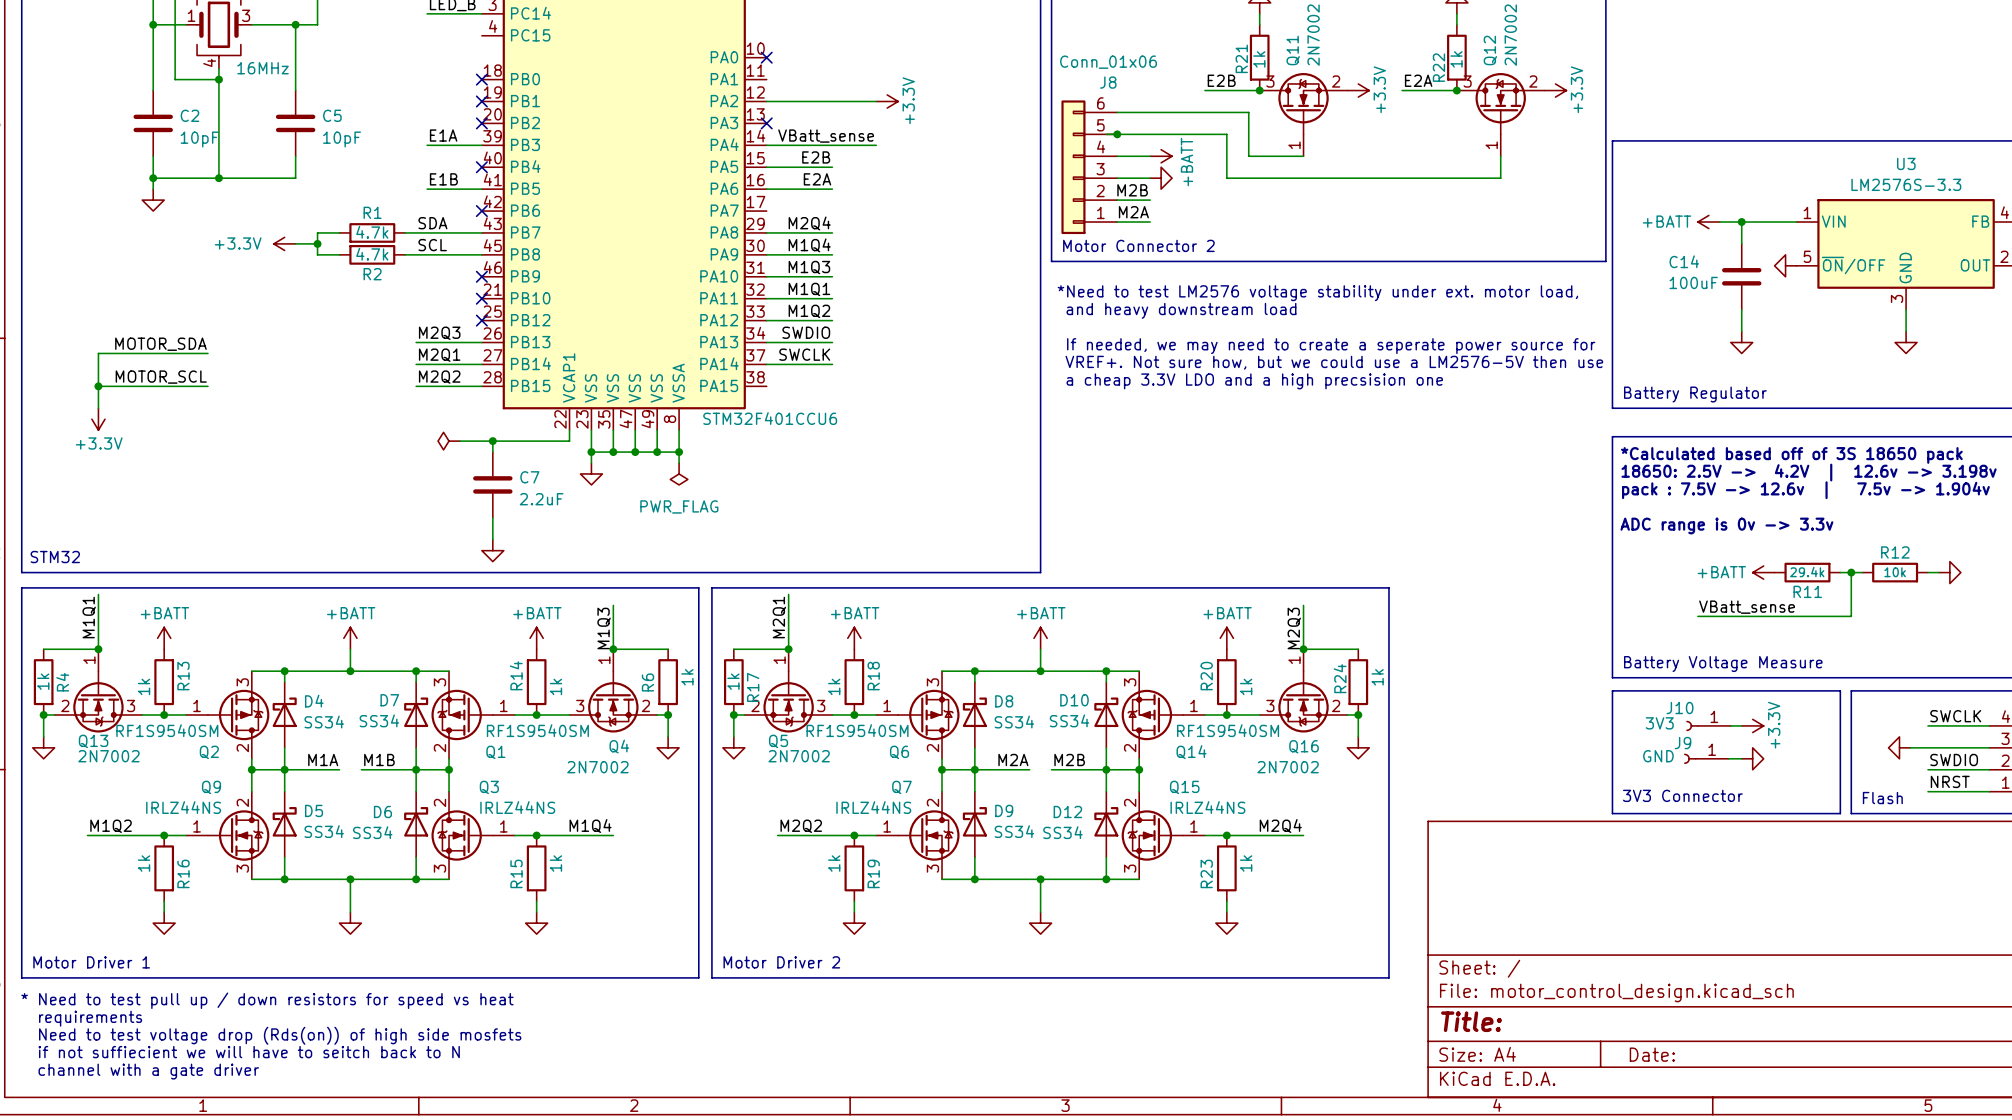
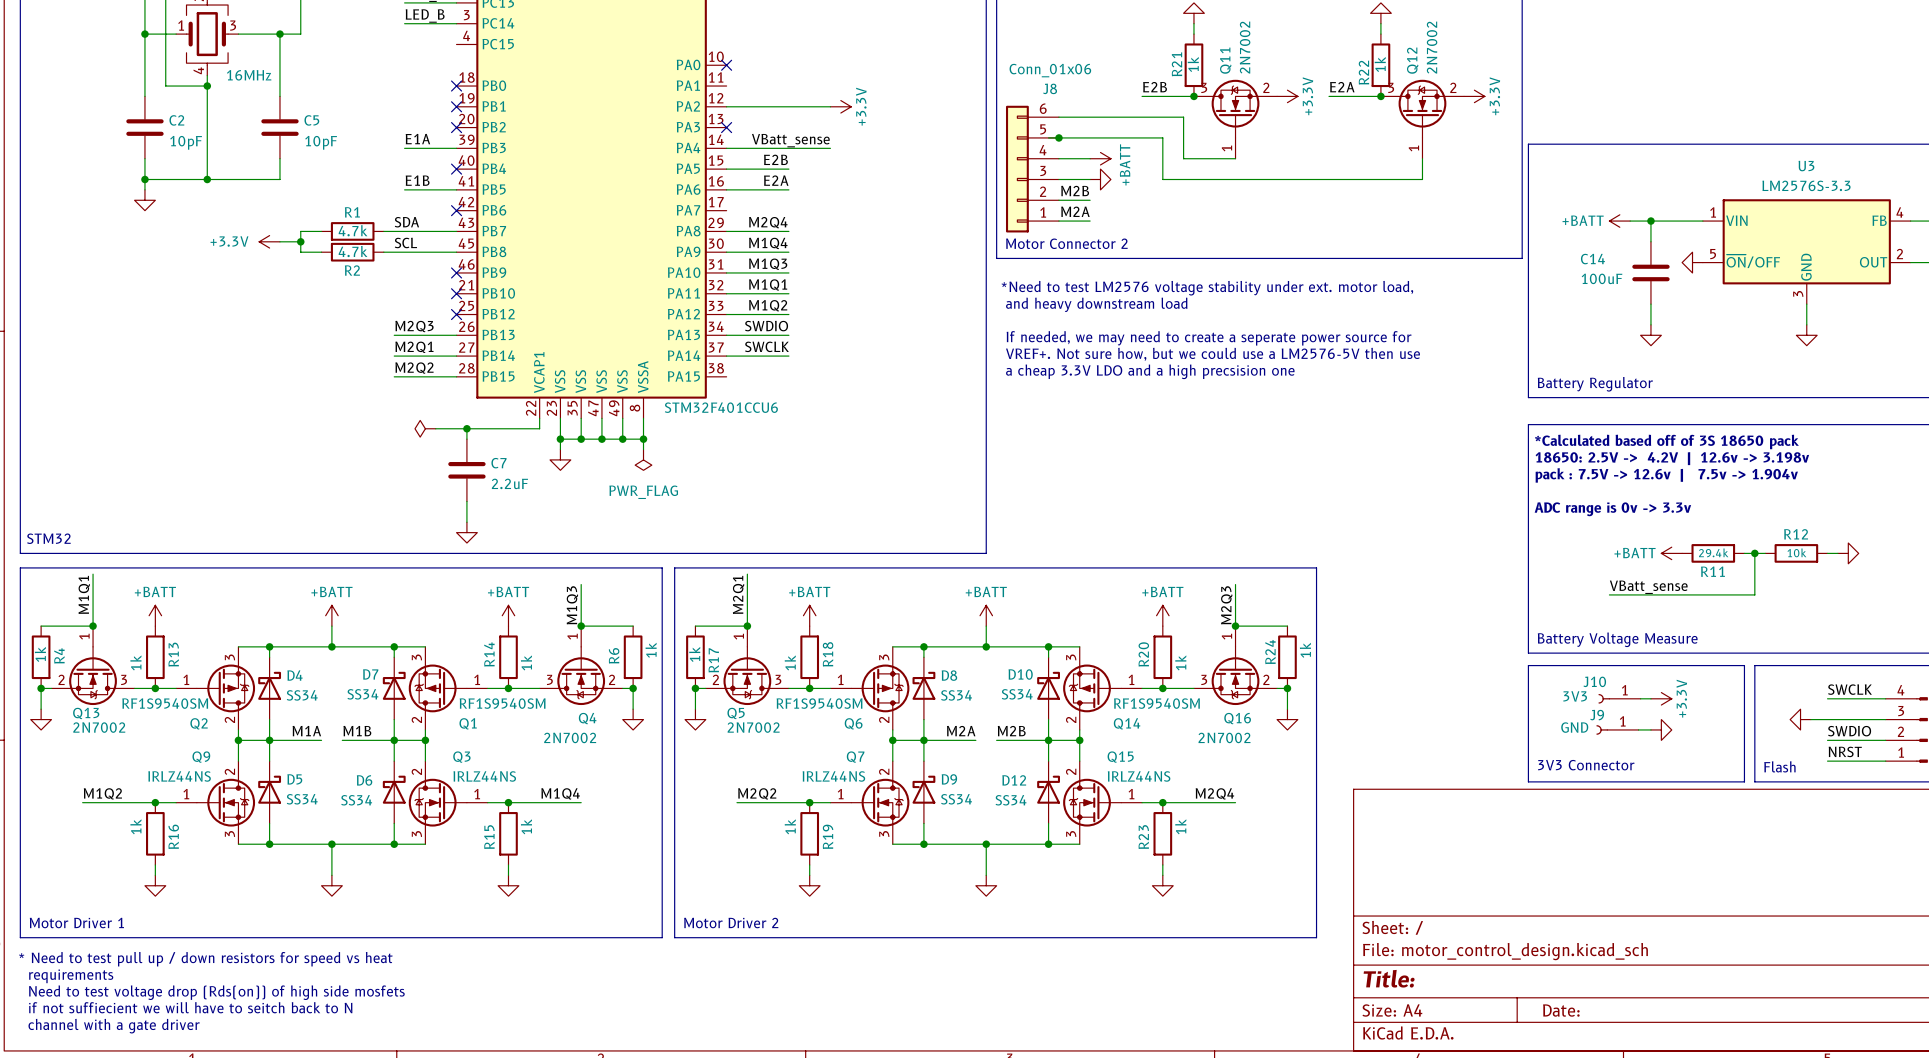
label: MOTOR_SDA (160, 344) -> none
wire: (207, 353) (98, 353) (98, 408) -> none
label: MOTOR_SCL (161, 377) -> none
wire: (98, 386) (207, 386) -> none
junction: (98, 386) -> none
power symbol: +3.3V (98, 419) -> none

